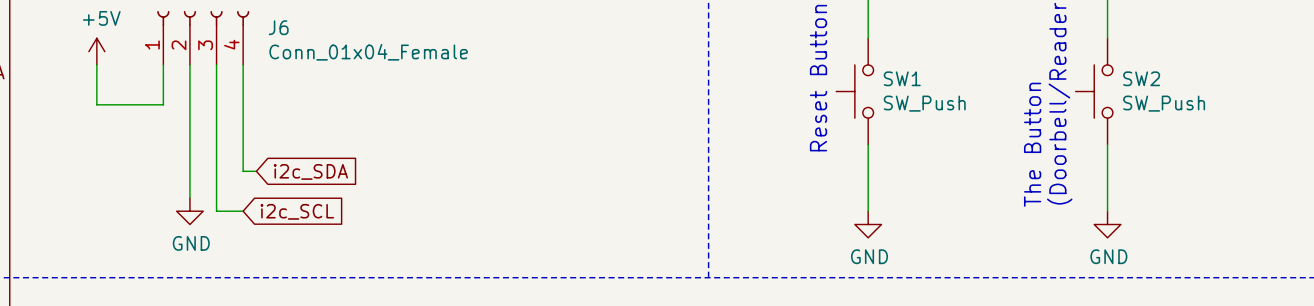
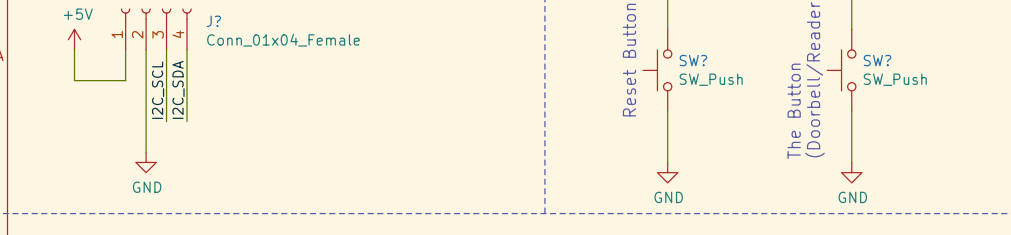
J6 name: J6 (278, 27) -> J? (213, 21)
SW1 name: SW1 (902, 78) -> SW? (693, 60)
SW2 name: SW2 (1141, 78) -> SW? (877, 60)
label: none -> I2C_SDA (178, 89)
label: none -> I2C_SCL (158, 90)
wire: (216, 158) (216, 211) (243, 211) -> none
wire: (243, 158) (243, 171) (256, 171) -> none
global label: i2c_SDA (310, 171) -> none
global label: i2c_SCL (297, 211) -> none

